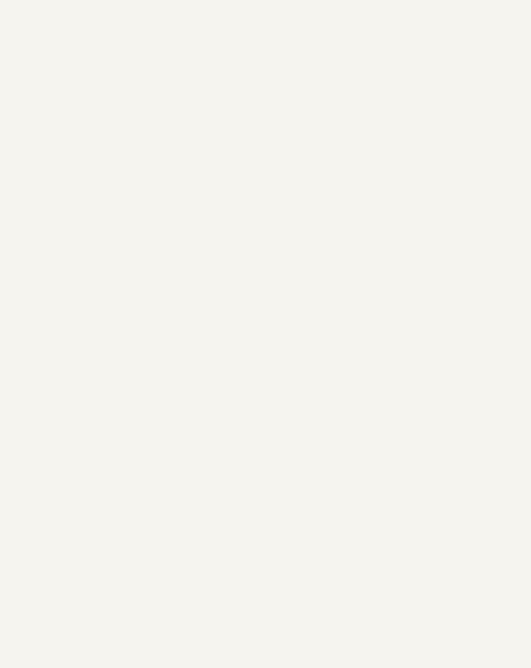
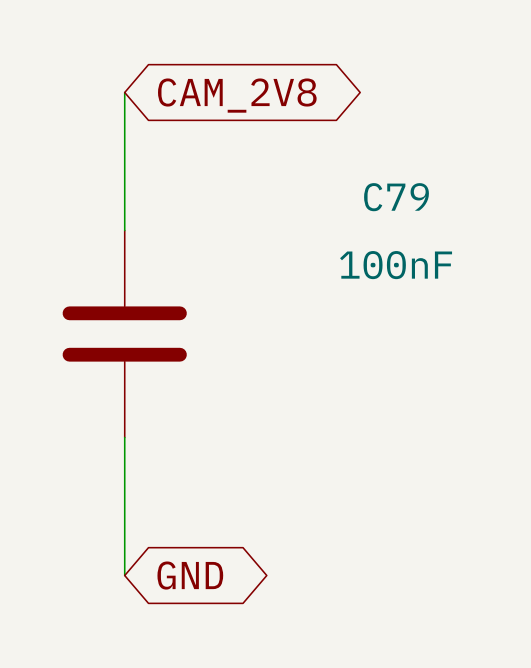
wire: none -> (124, 92) (124, 230)
global label: none -> CAM_2V8 (237, 95)
C79: none -> 100nF (124, 334)
wire: none -> (124, 437) (124, 575)
global label: none -> GND (190, 575)

